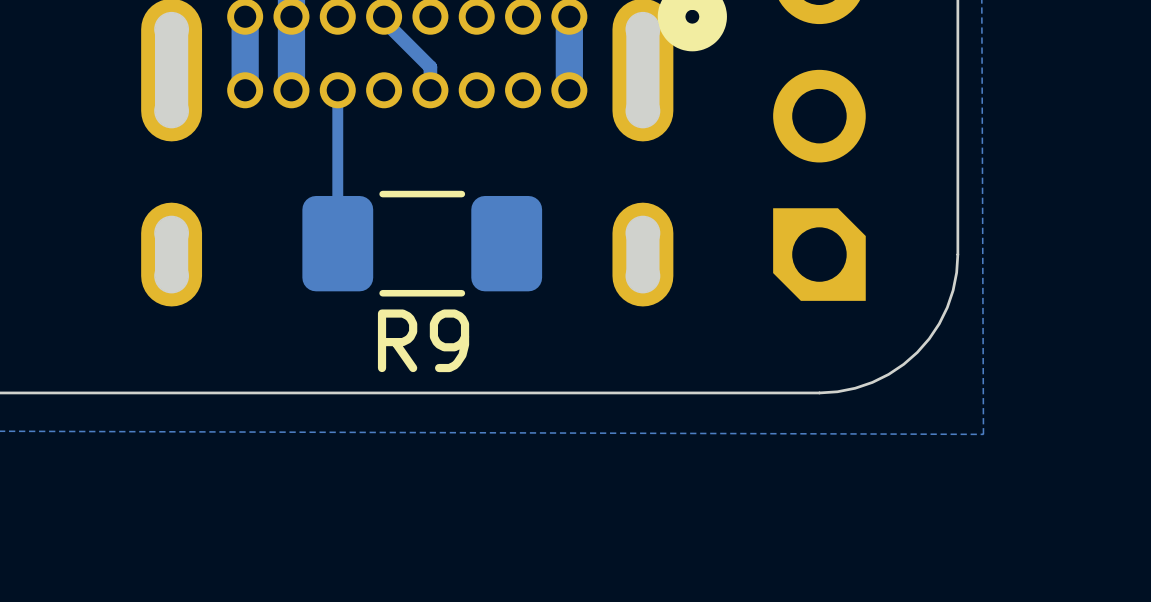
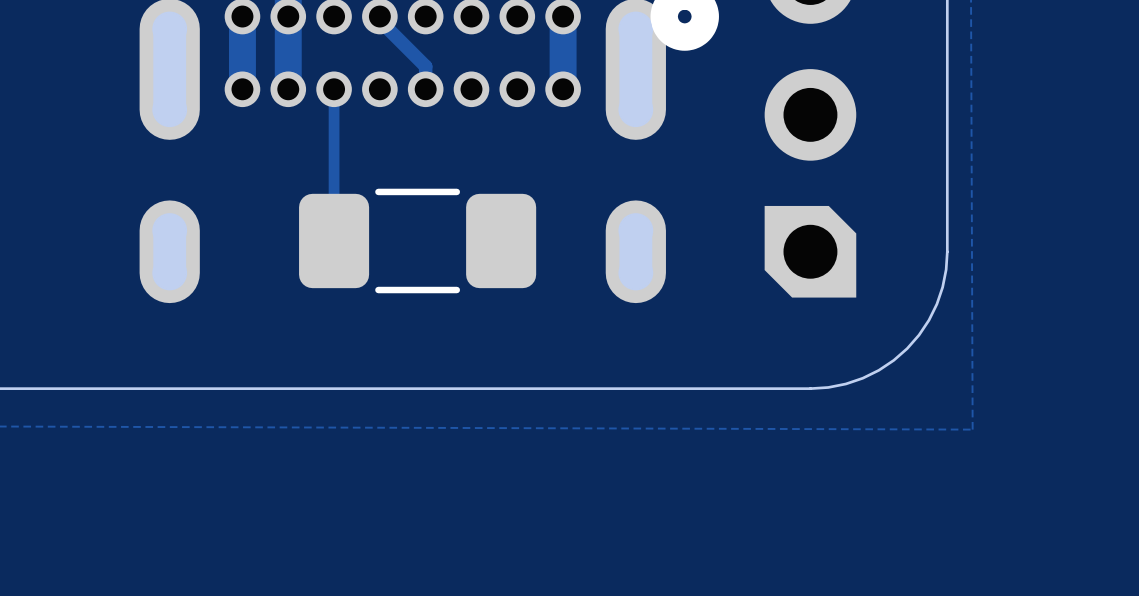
R9 name: R9 (423, 340) -> none

